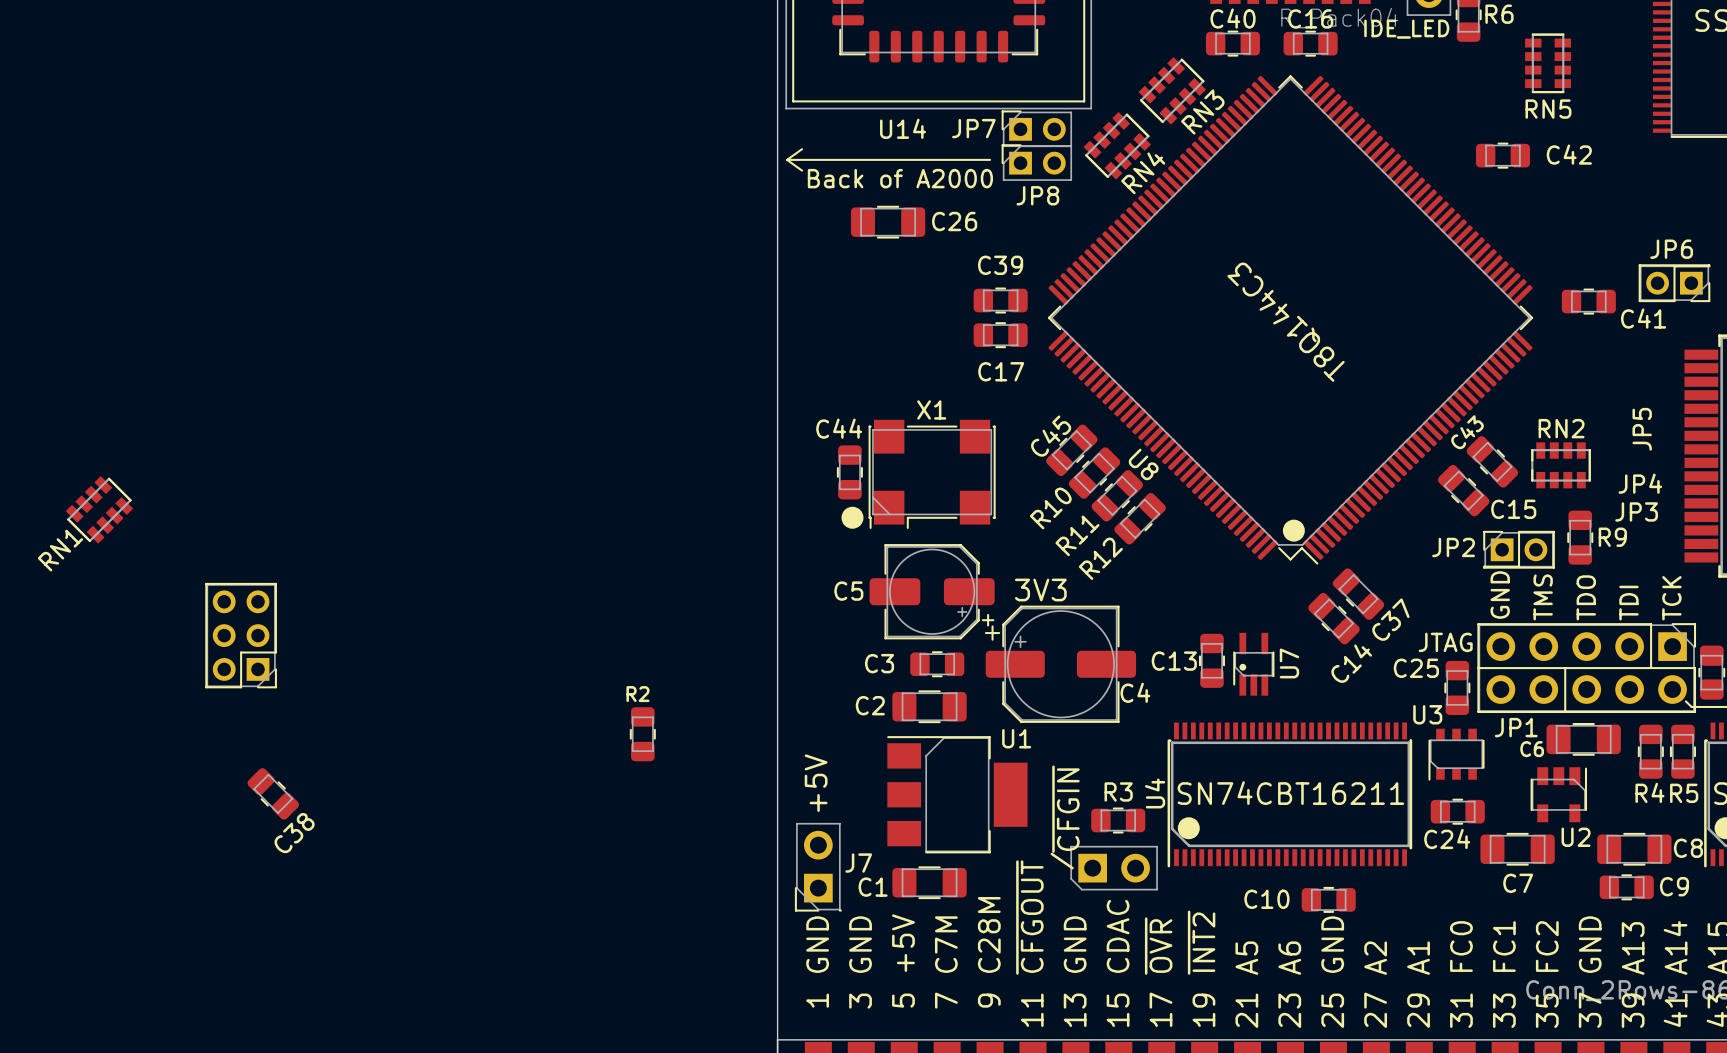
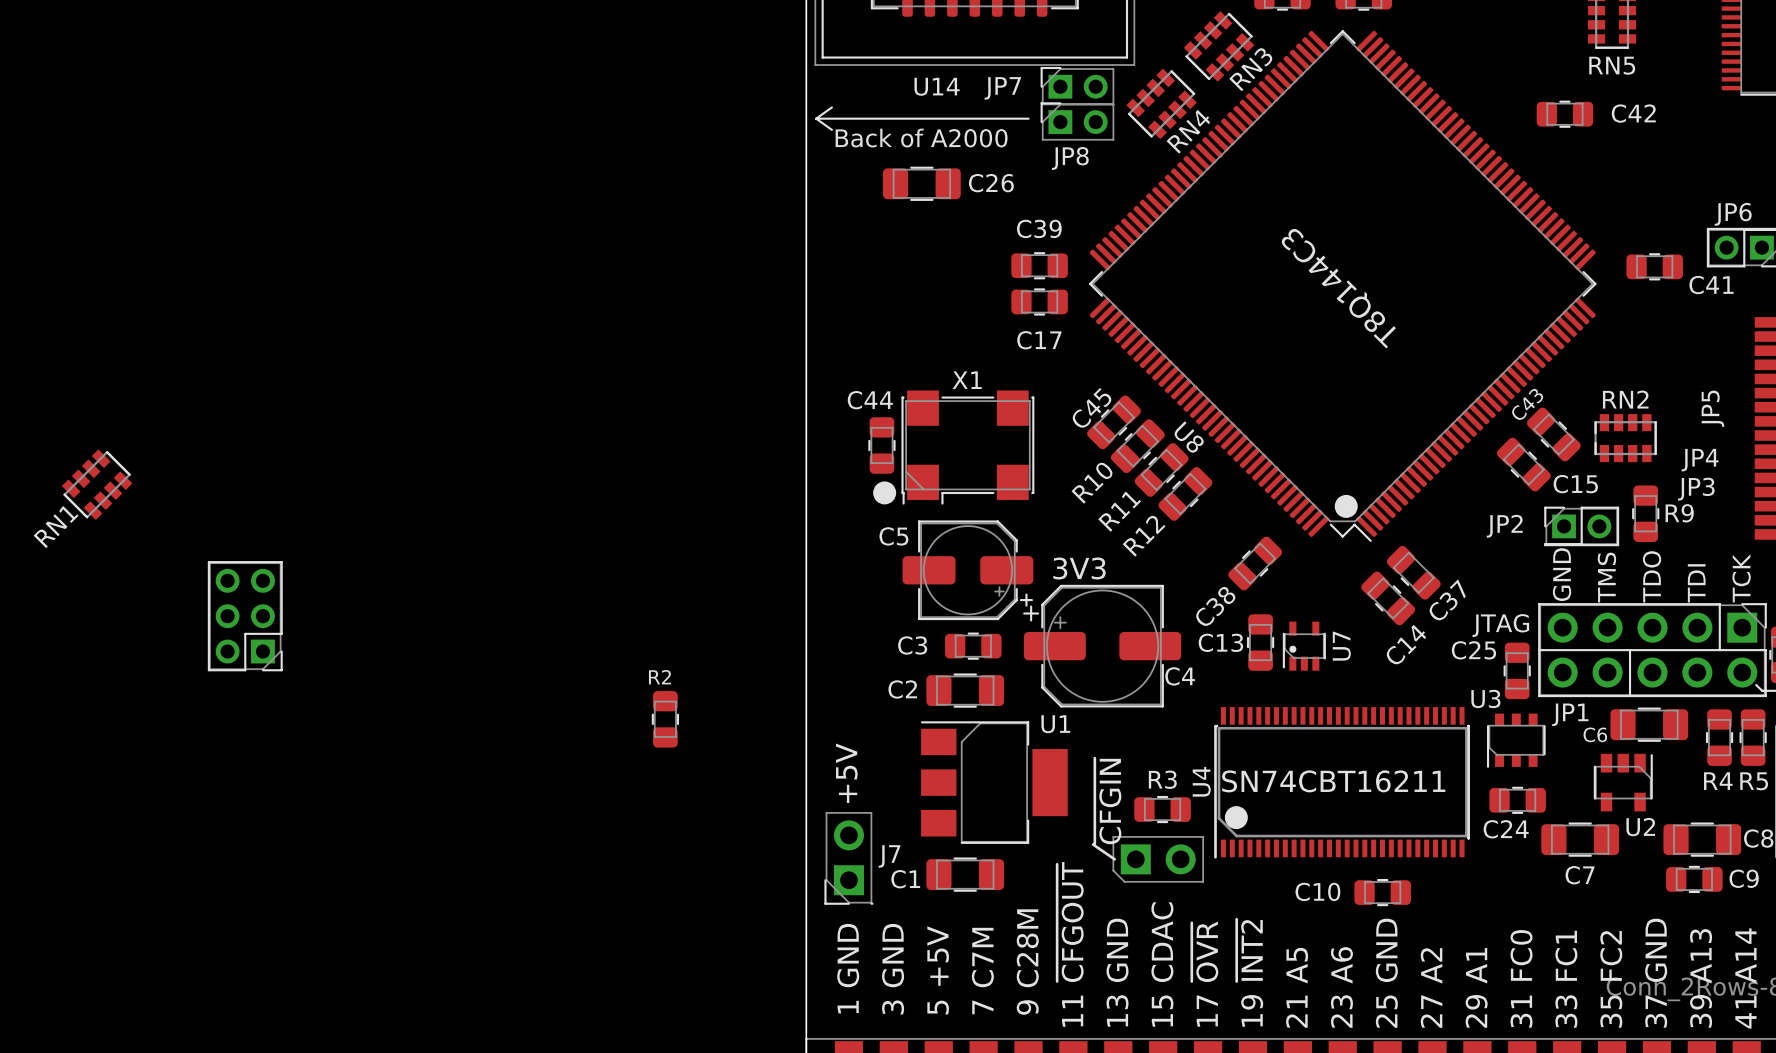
C5 name position: C5 (848, 591) -> C5 (893, 536)
U7 footprint: [1233, 632, 1275, 696] -> [1282, 621, 1326, 671]
C38 rotation: 0° (273, 793) -> 90° clockwise (1255, 563)
C38 position: (273, 793) -> (1255, 563)

